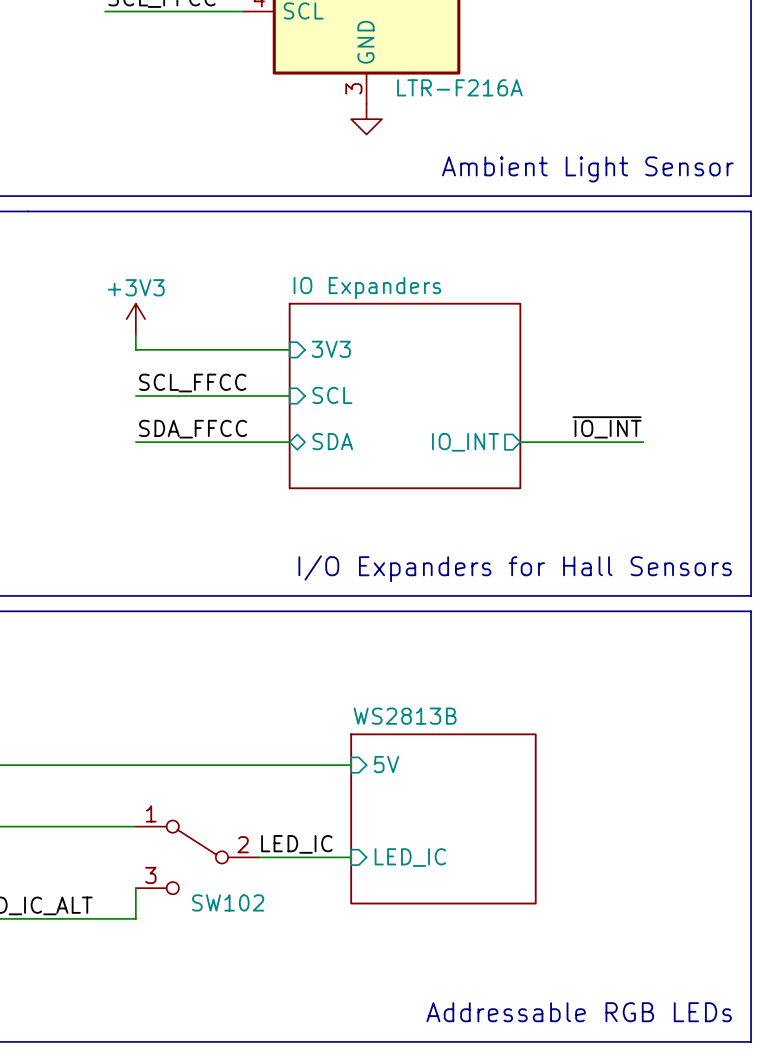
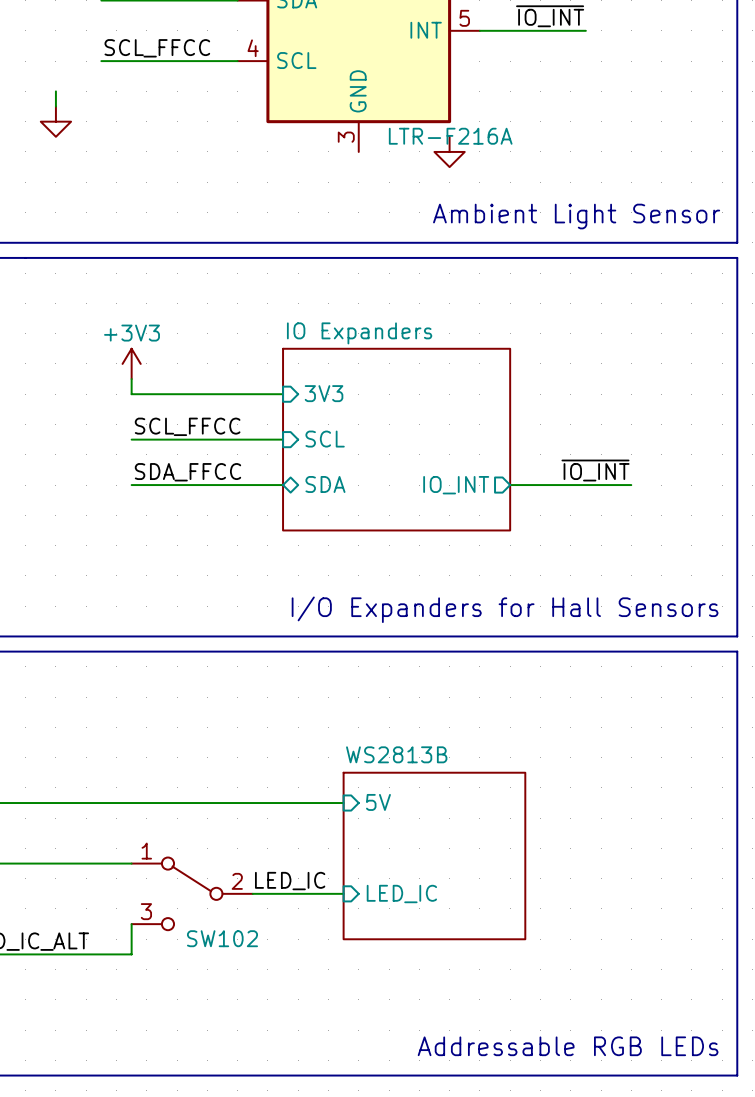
wire: none -> (55, 91) (55, 106)
power symbol: none -> (55, 121)
power symbol position: (366, 119) -> (449, 151)

